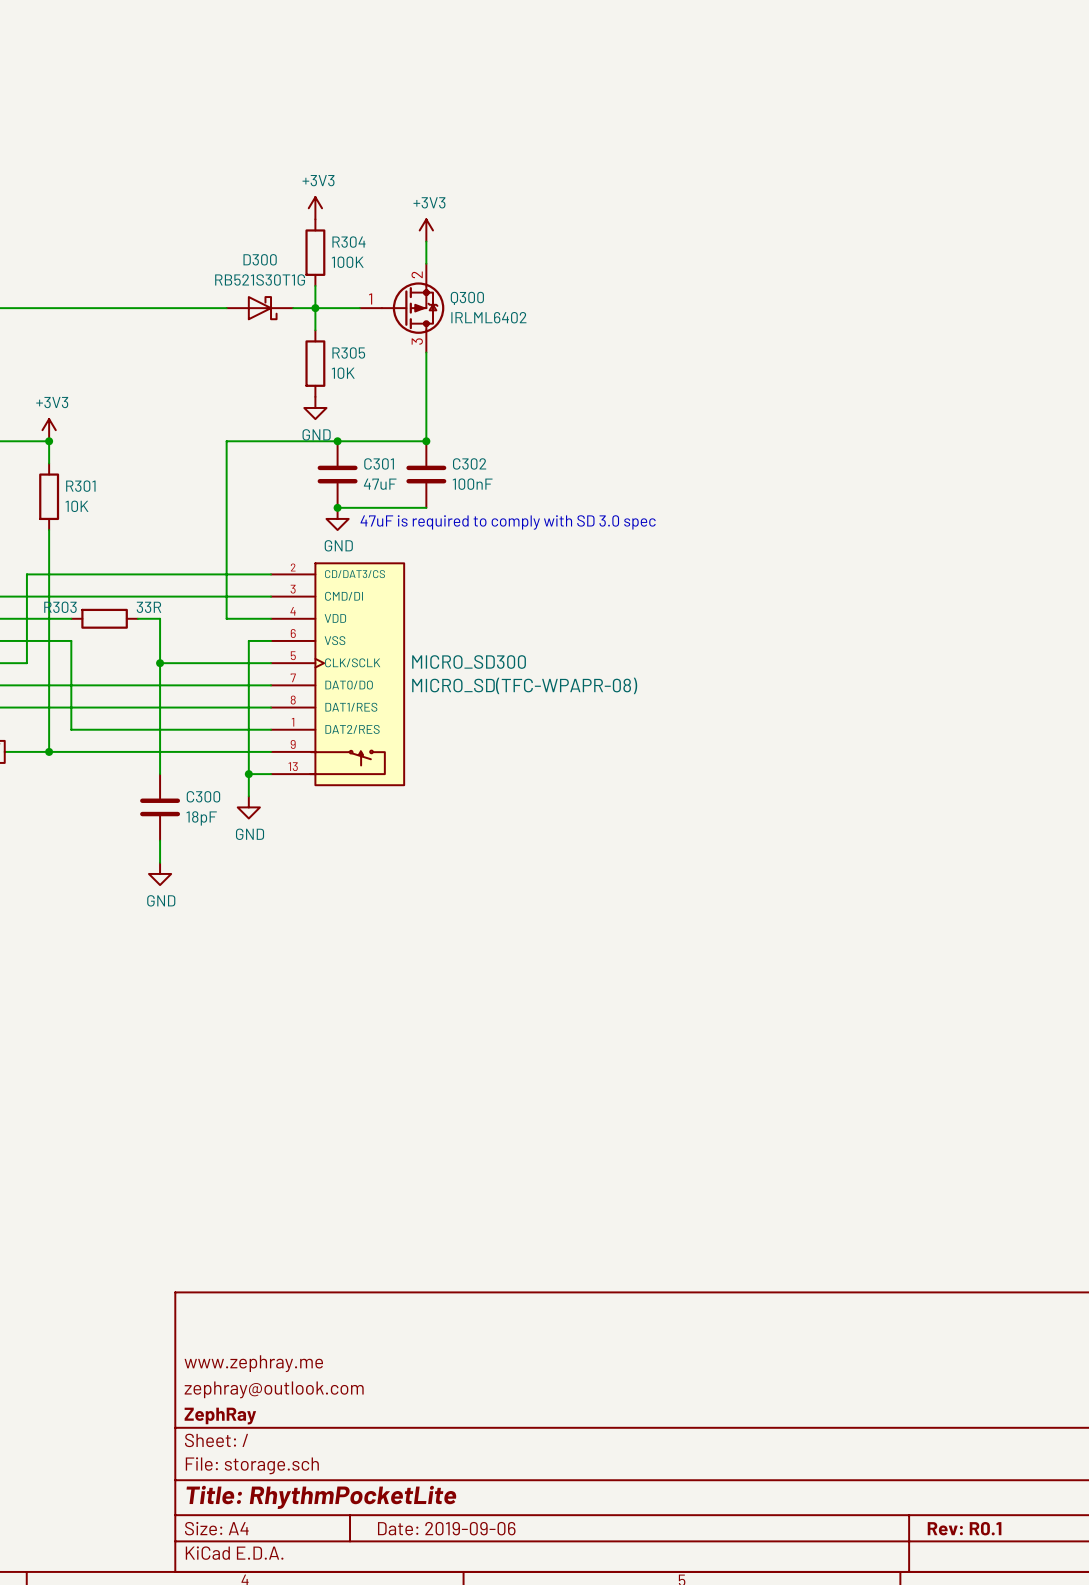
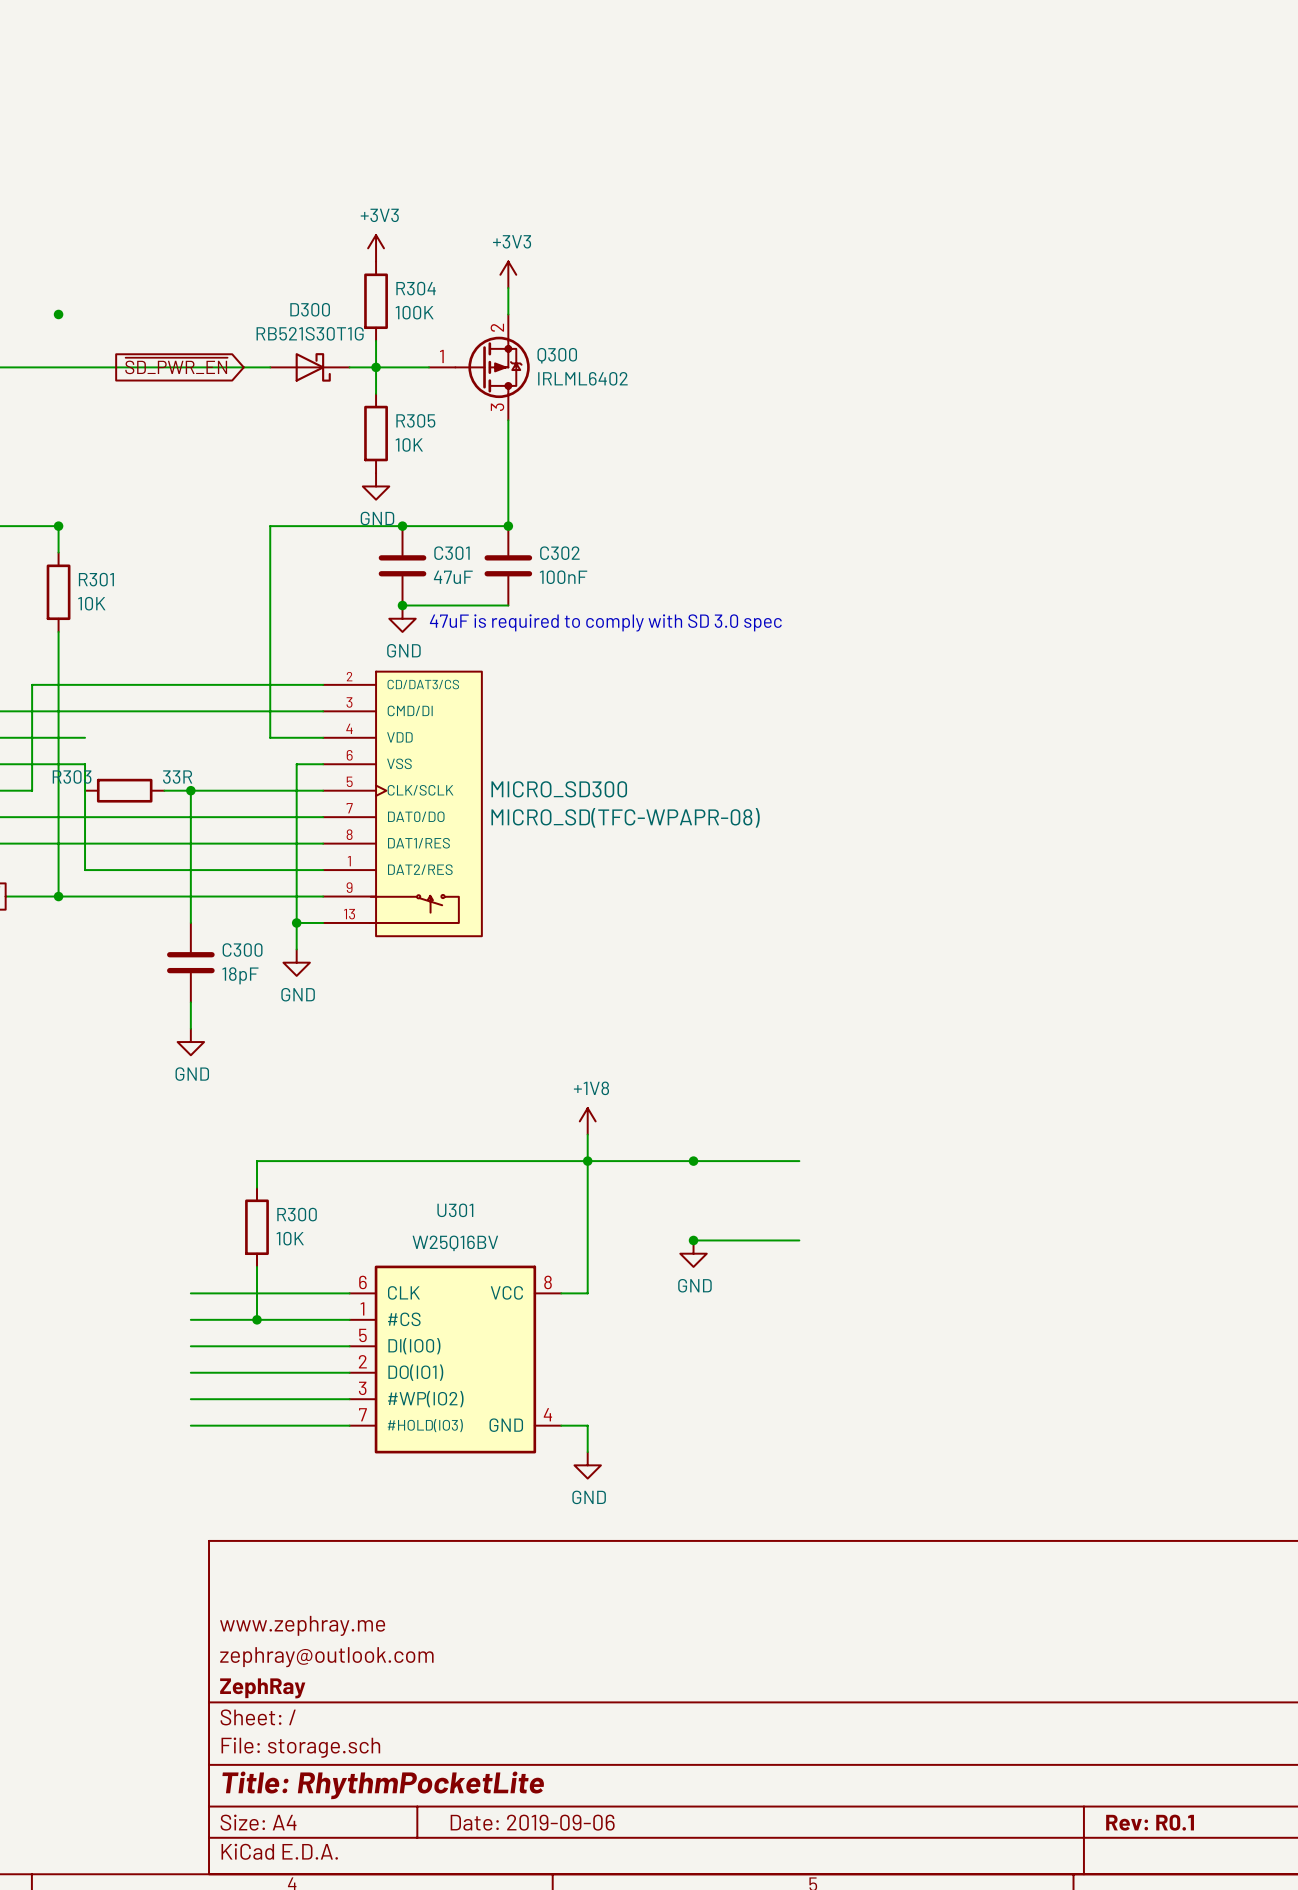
junction: none -> (58, 314)
global label: none -> ~{SD_PWR_EN} (176, 365)
power symbol: +3V3 (49, 430) -> none
R303 position: (104, 618) -> (124, 790)
wire: (137, 618) (160, 618) (160, 663) -> (164, 790) (190, 790)
power symbol: none -> +1V8 (587, 1121)
wire: none -> (587, 1134) (587, 1293) (561, 1293)
junction: none -> (587, 1161)
junction: none -> (693, 1161)
wire: none -> (799, 1161) (257, 1161) (257, 1187)
R300: none -> 10K (257, 1227)
wire: none -> (693, 1240) (799, 1240)
junction: none -> (693, 1240)
power symbol: none -> GND (693, 1253)
wire: none -> (257, 1266) (257, 1319)
wire: none -> (190, 1293) (349, 1293)
wire: none -> (190, 1319) (349, 1319)
junction: none -> (257, 1319)
wire: none -> (190, 1346) (349, 1346)
U301: none -> W25Q16BV (455, 1359)
wire: none -> (190, 1372) (349, 1372)
wire: none -> (190, 1399) (349, 1399)
wire: none -> (190, 1425) (349, 1425)
wire: none -> (561, 1425) (587, 1425) (587, 1452)
power symbol: none -> GND (587, 1465)

